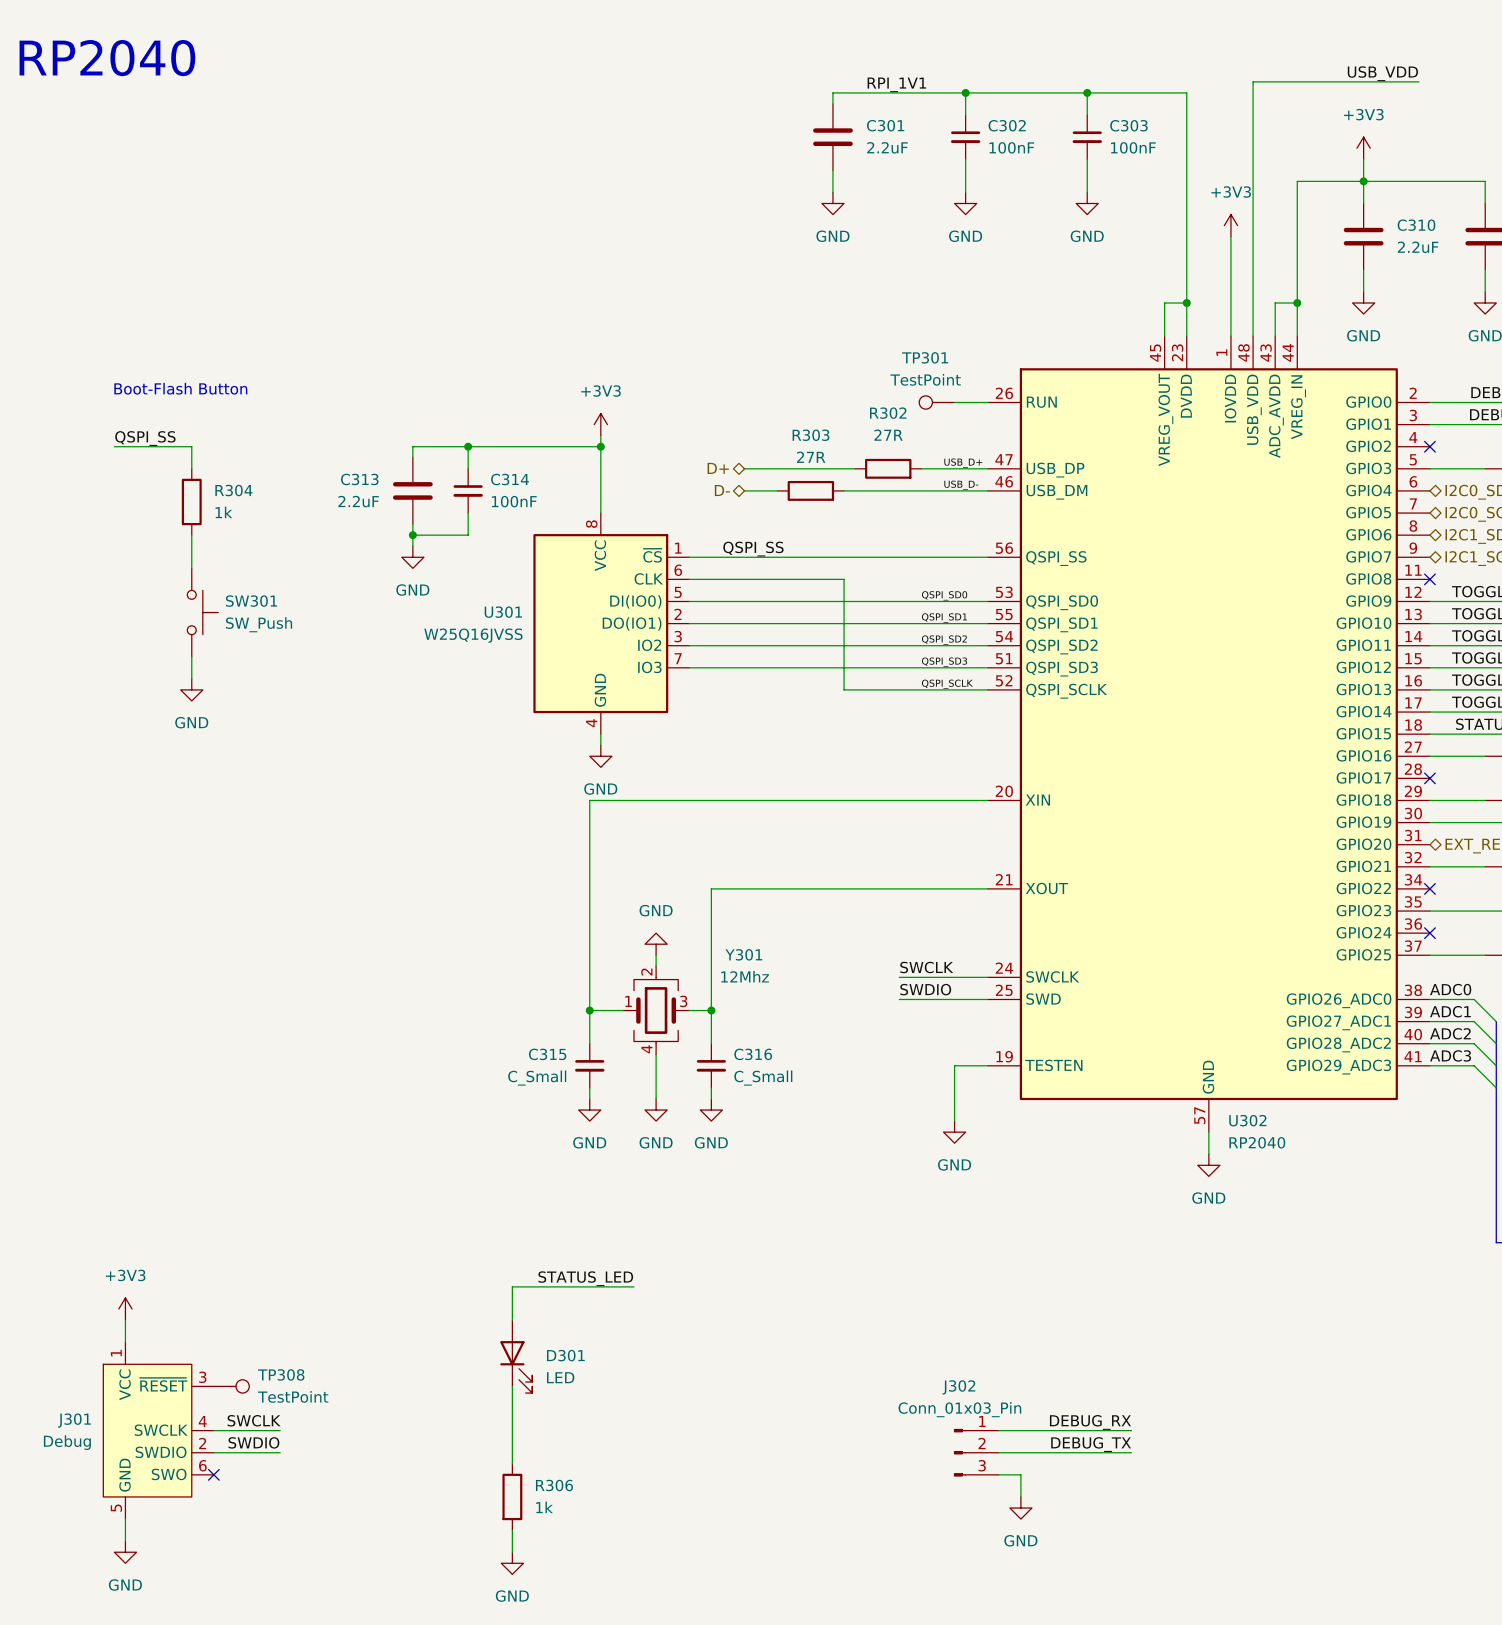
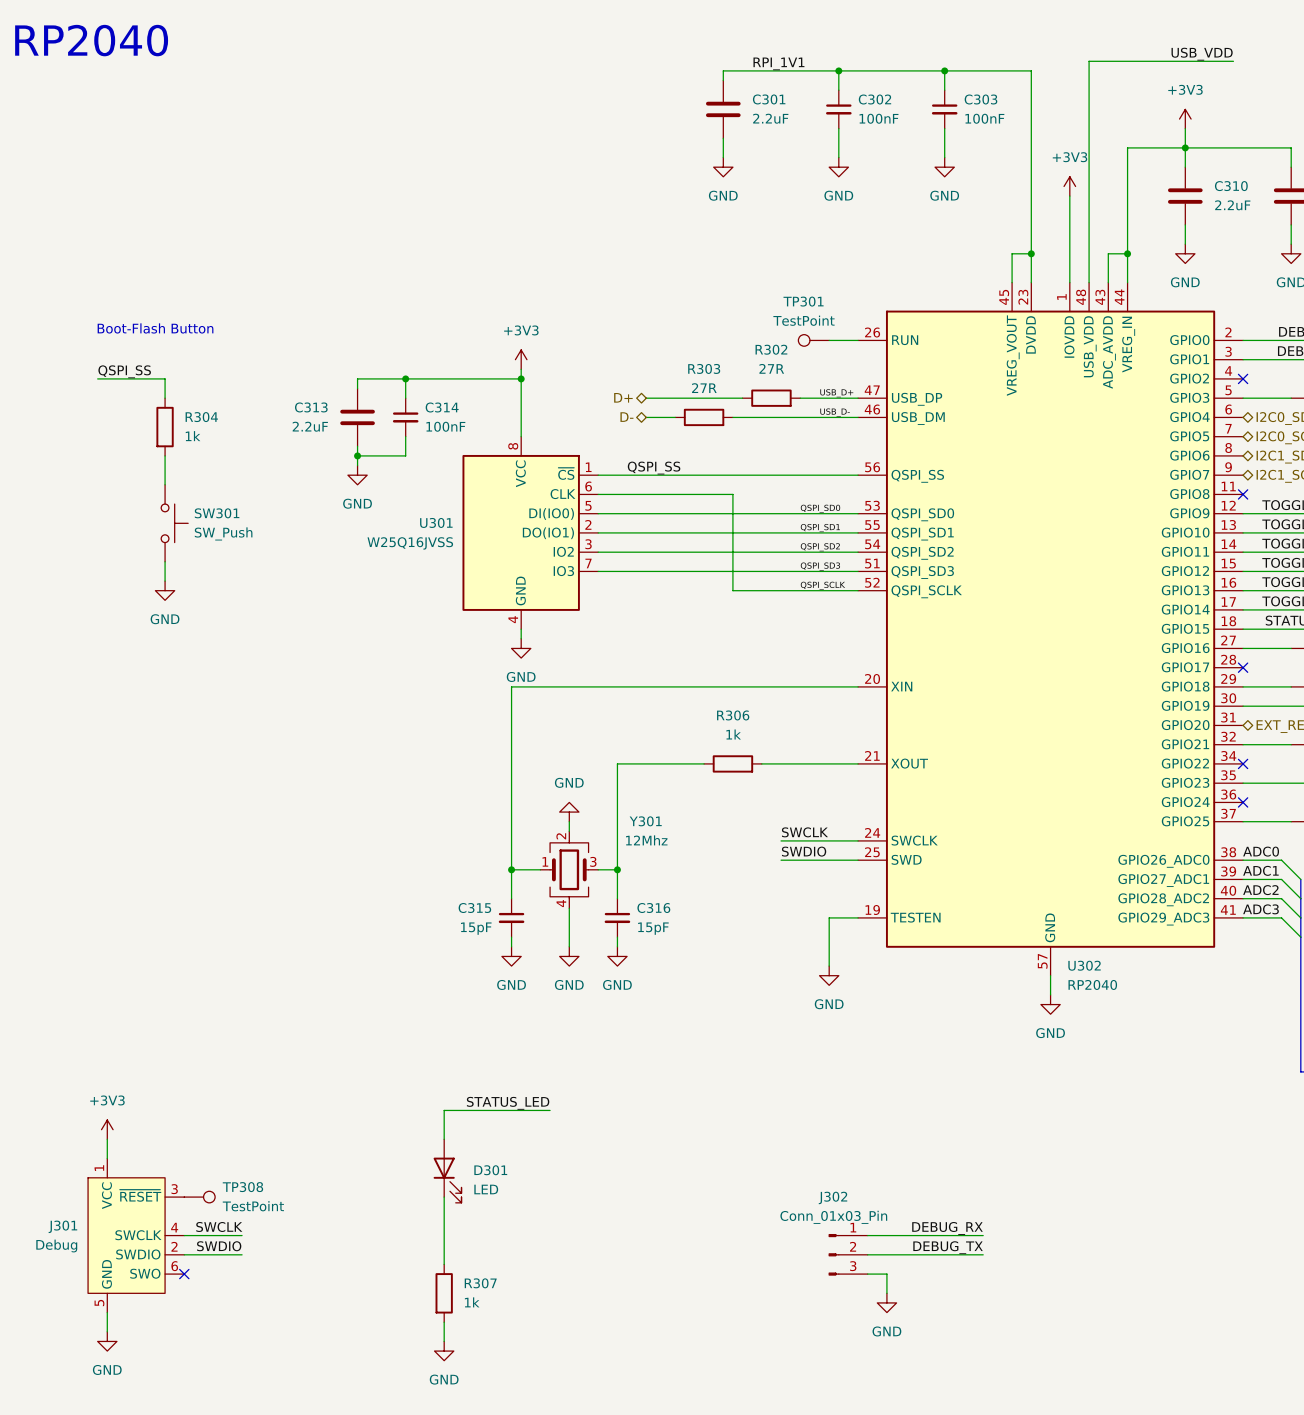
wire: (810, 888) (877, 888) -> none
R306: none -> 1k (732, 763)
C315 value: C_Small (537, 1078) -> 15pF (476, 928)
C316 value: C_Small (763, 1078) -> 15pF (653, 928)
R306 name: R306 (554, 1485) -> R307 (480, 1283)

